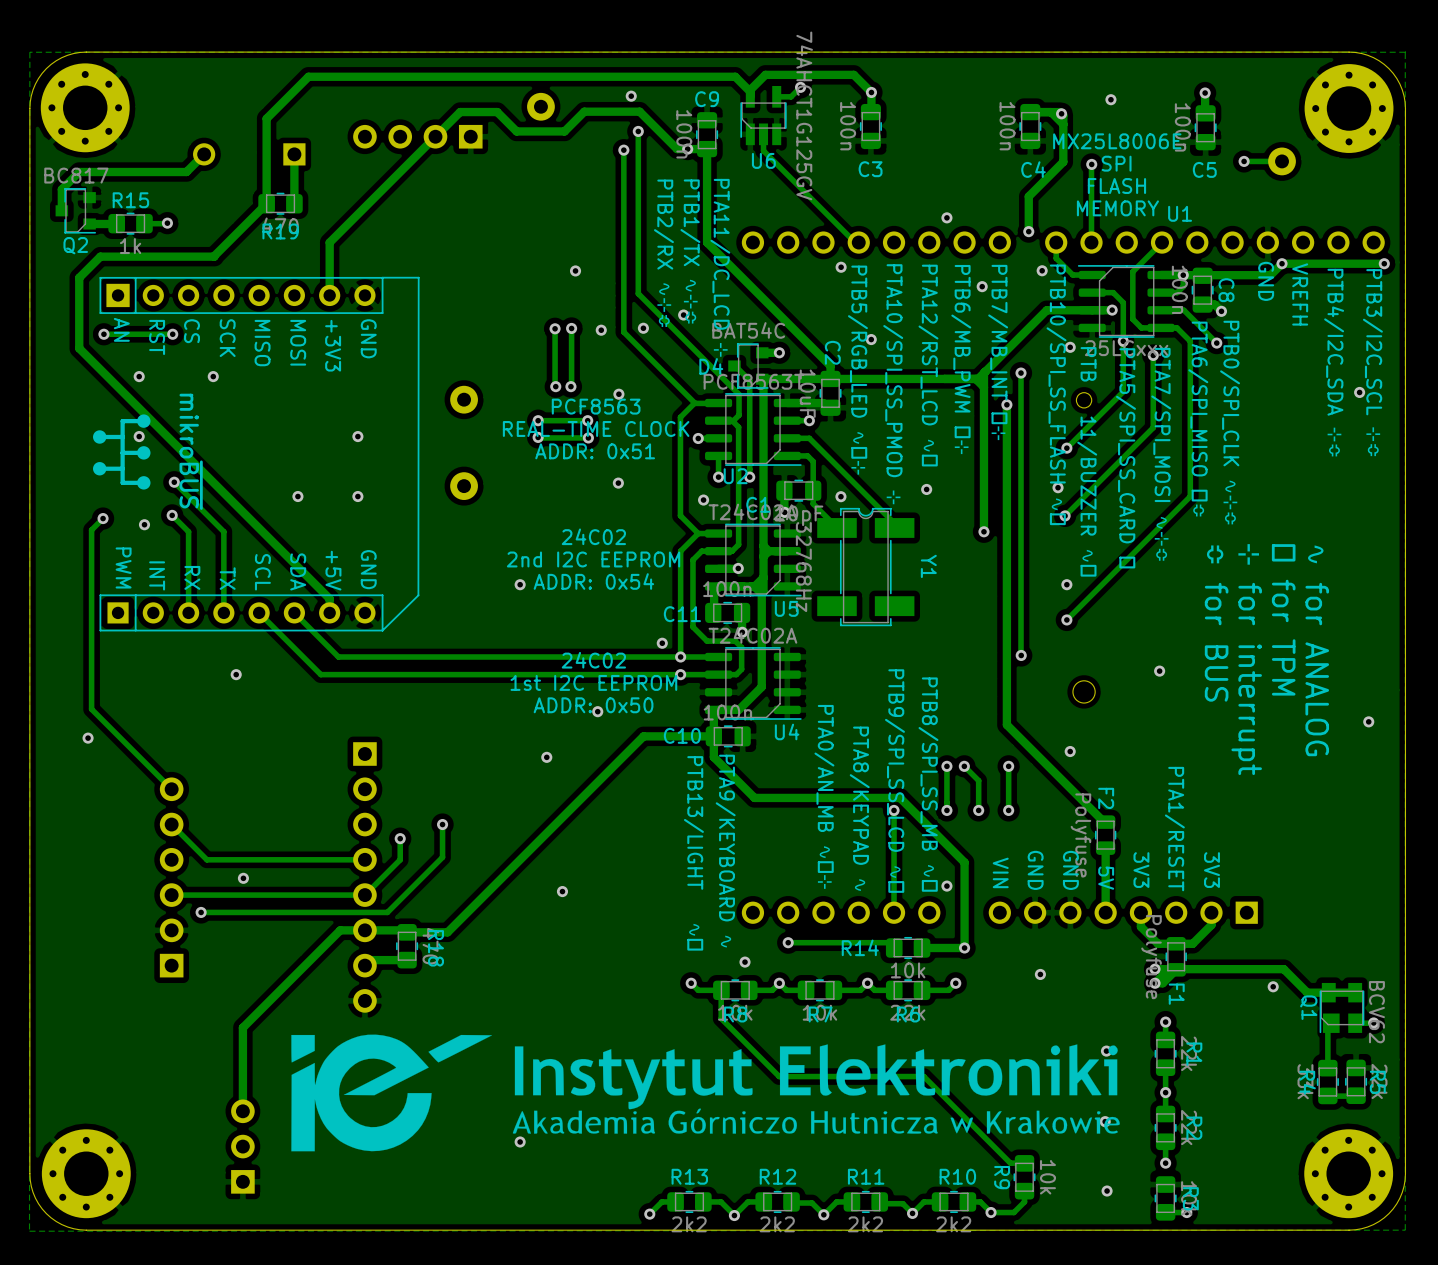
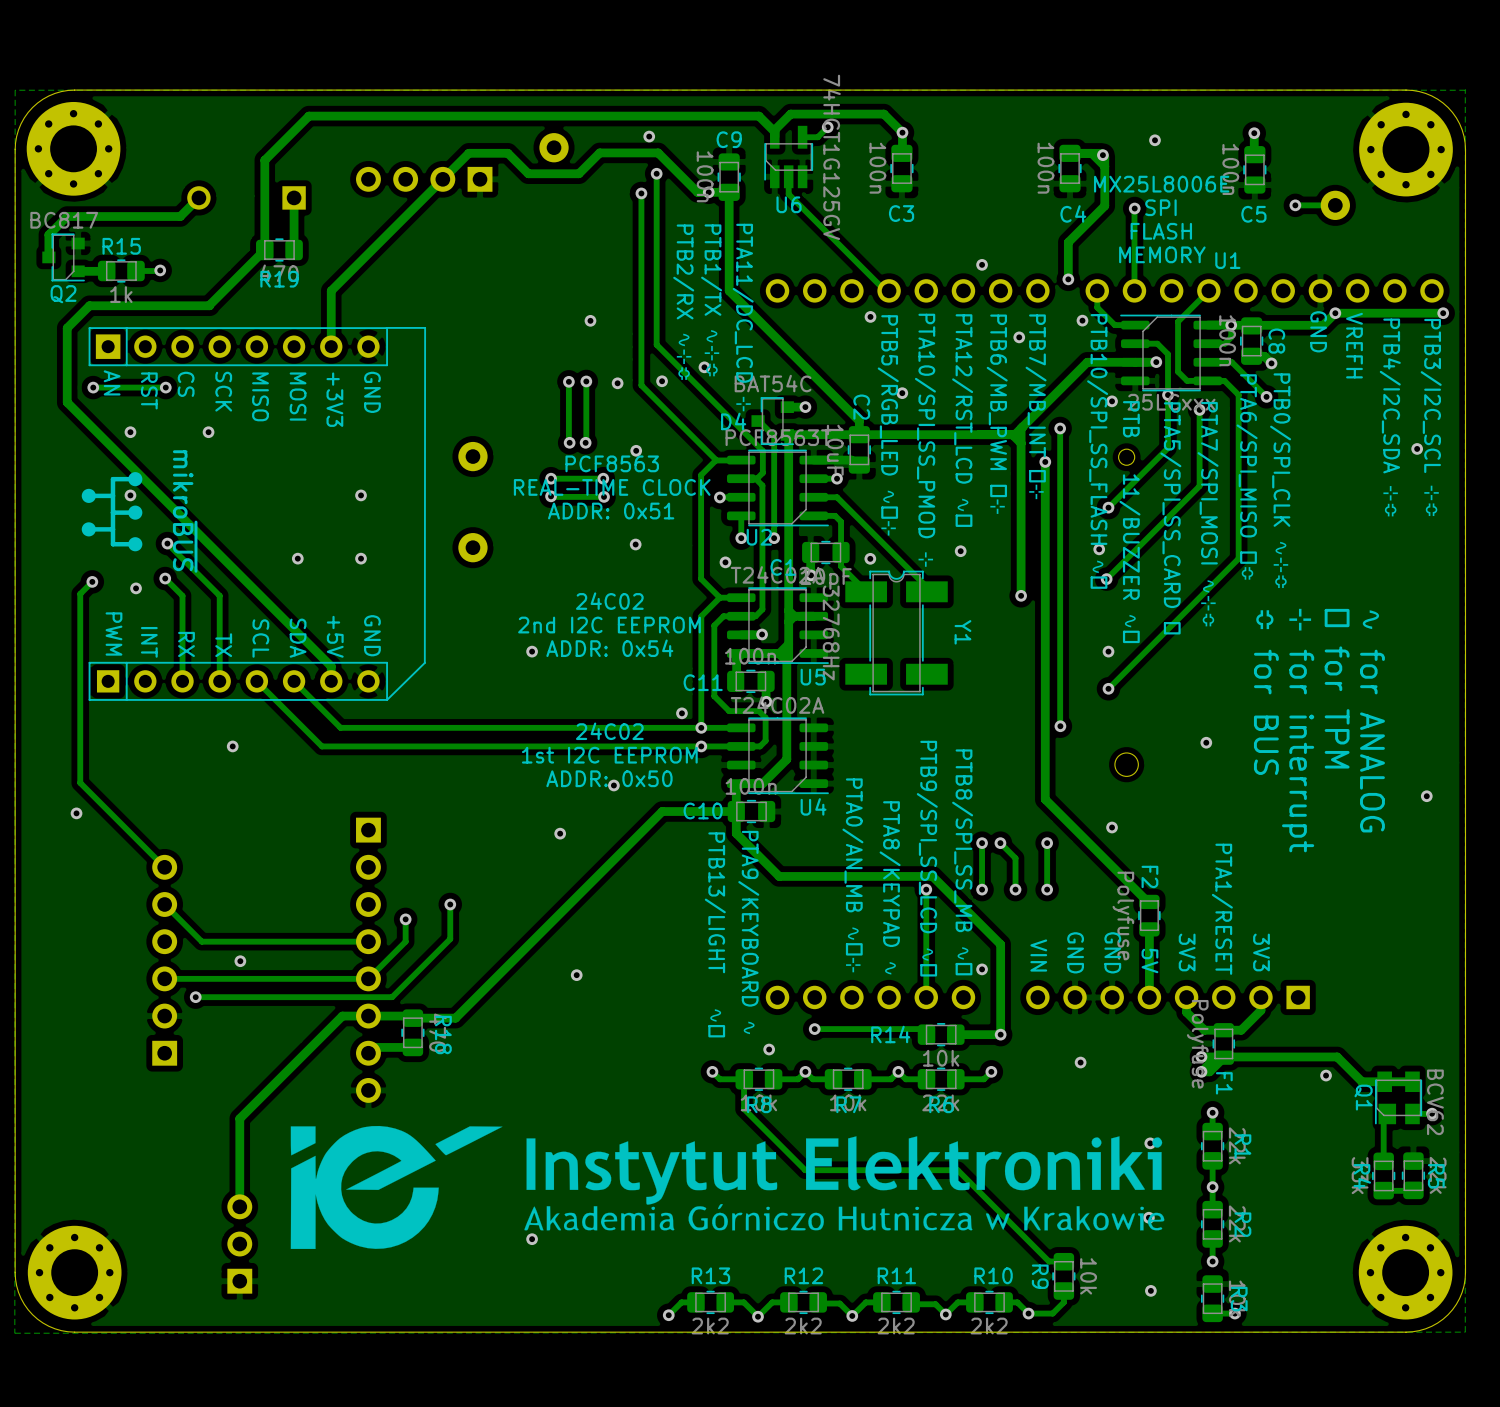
U6 value: 74AHCT1G125GV (804, 115) -> 74HCT1G125GV (832, 157)

